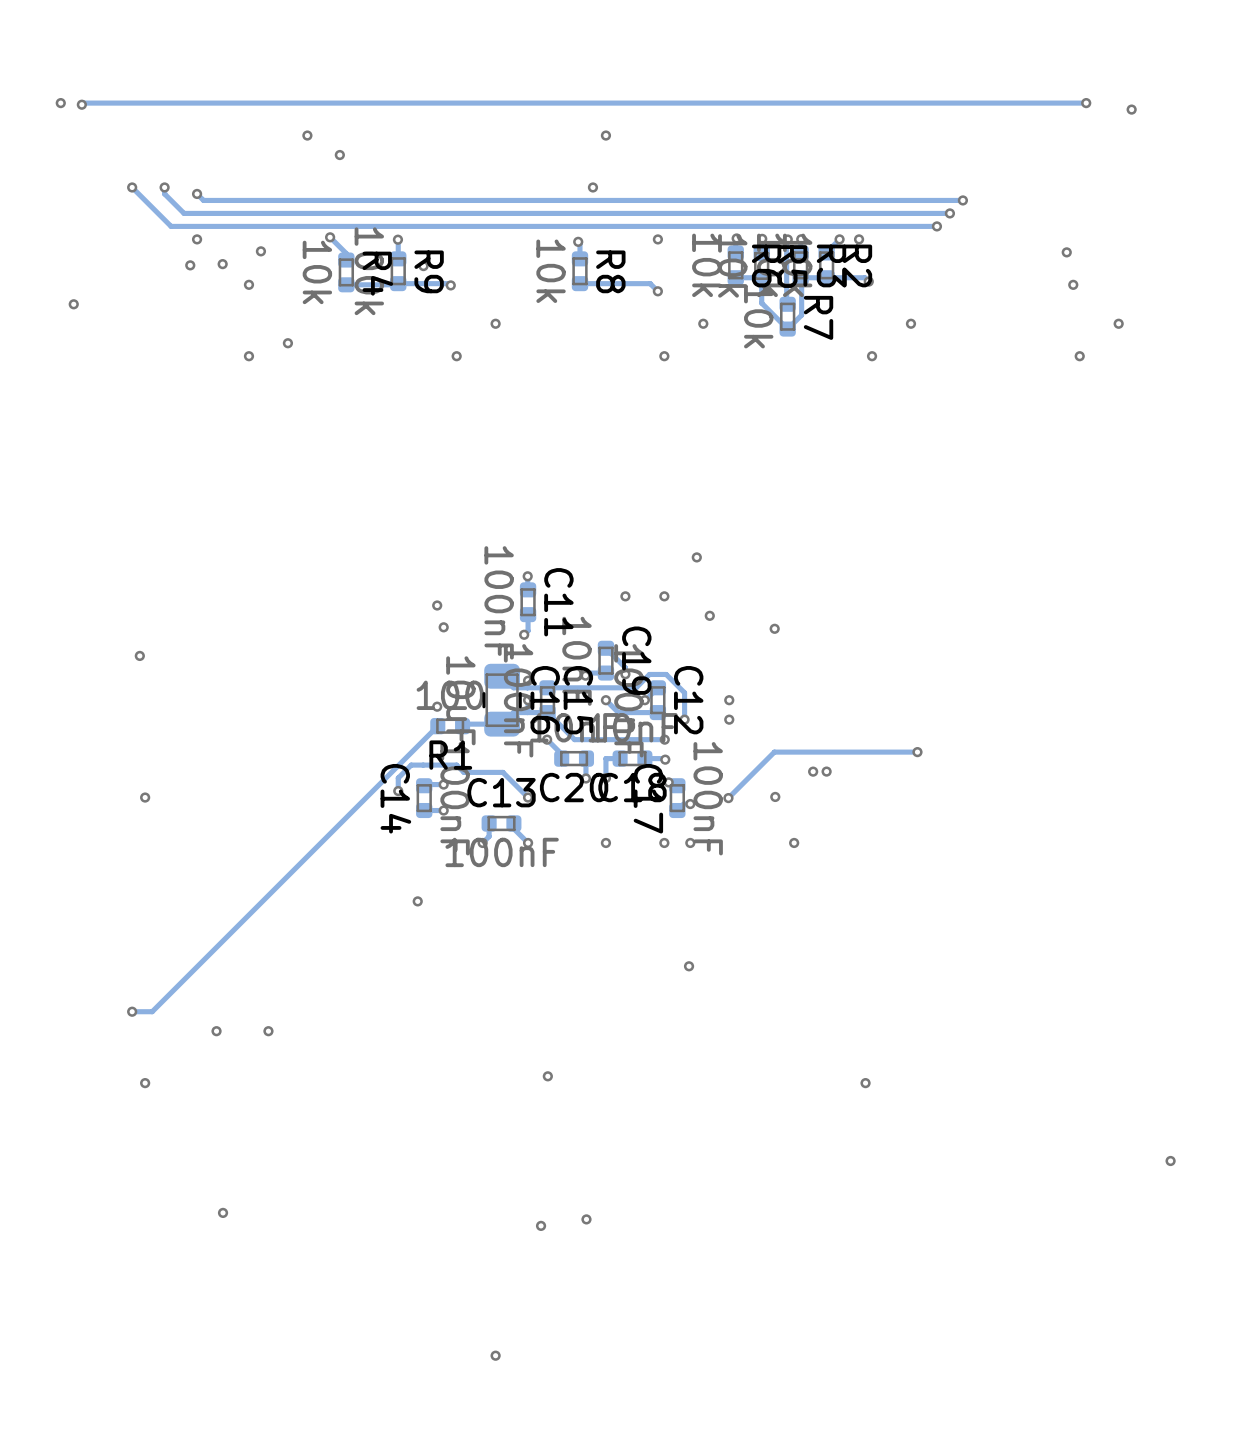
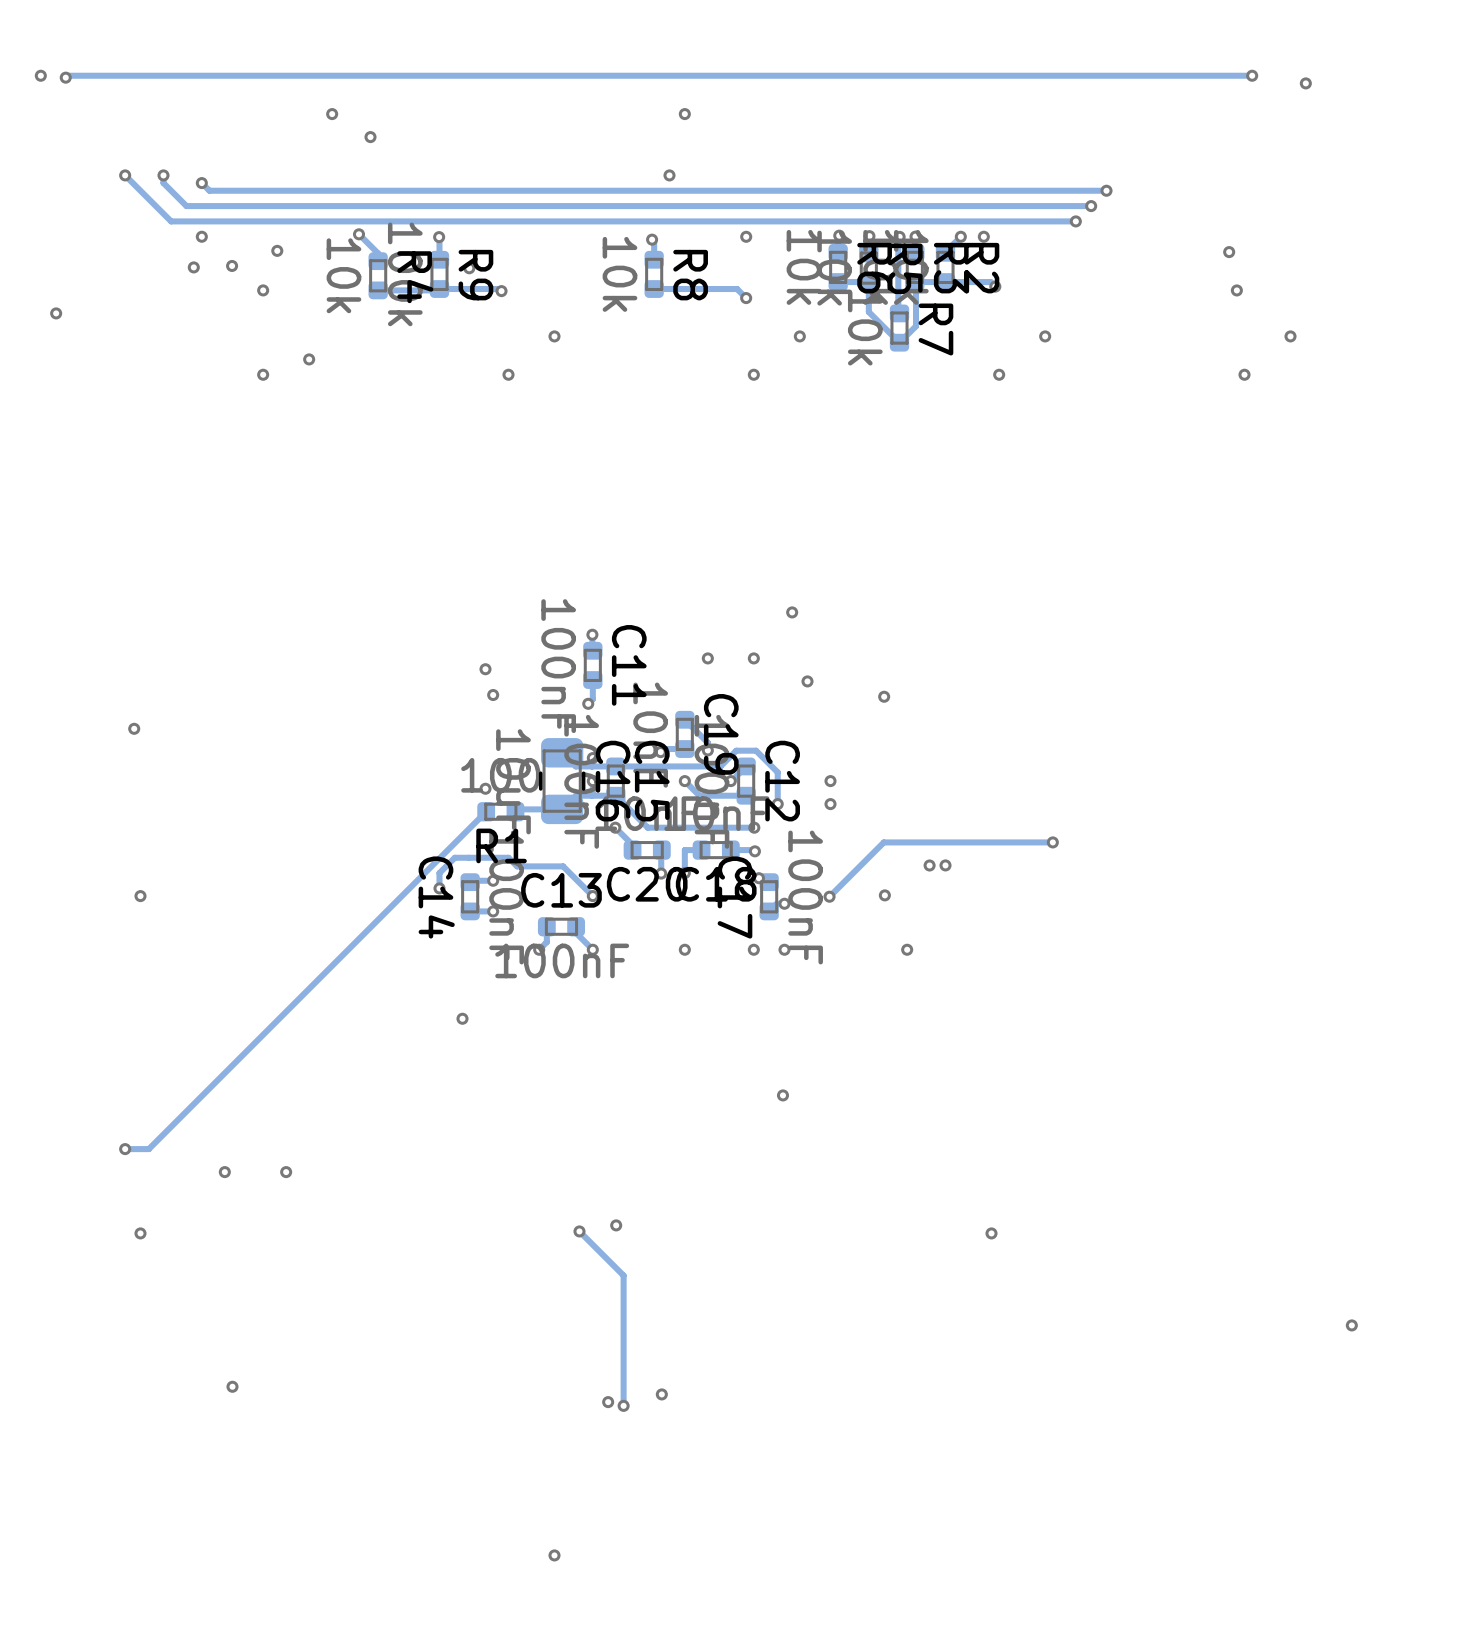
track: none -> (579, 1231) (623, 1275) (623, 1405)
via: none -> (579, 1231)
via: none -> (623, 1405)

